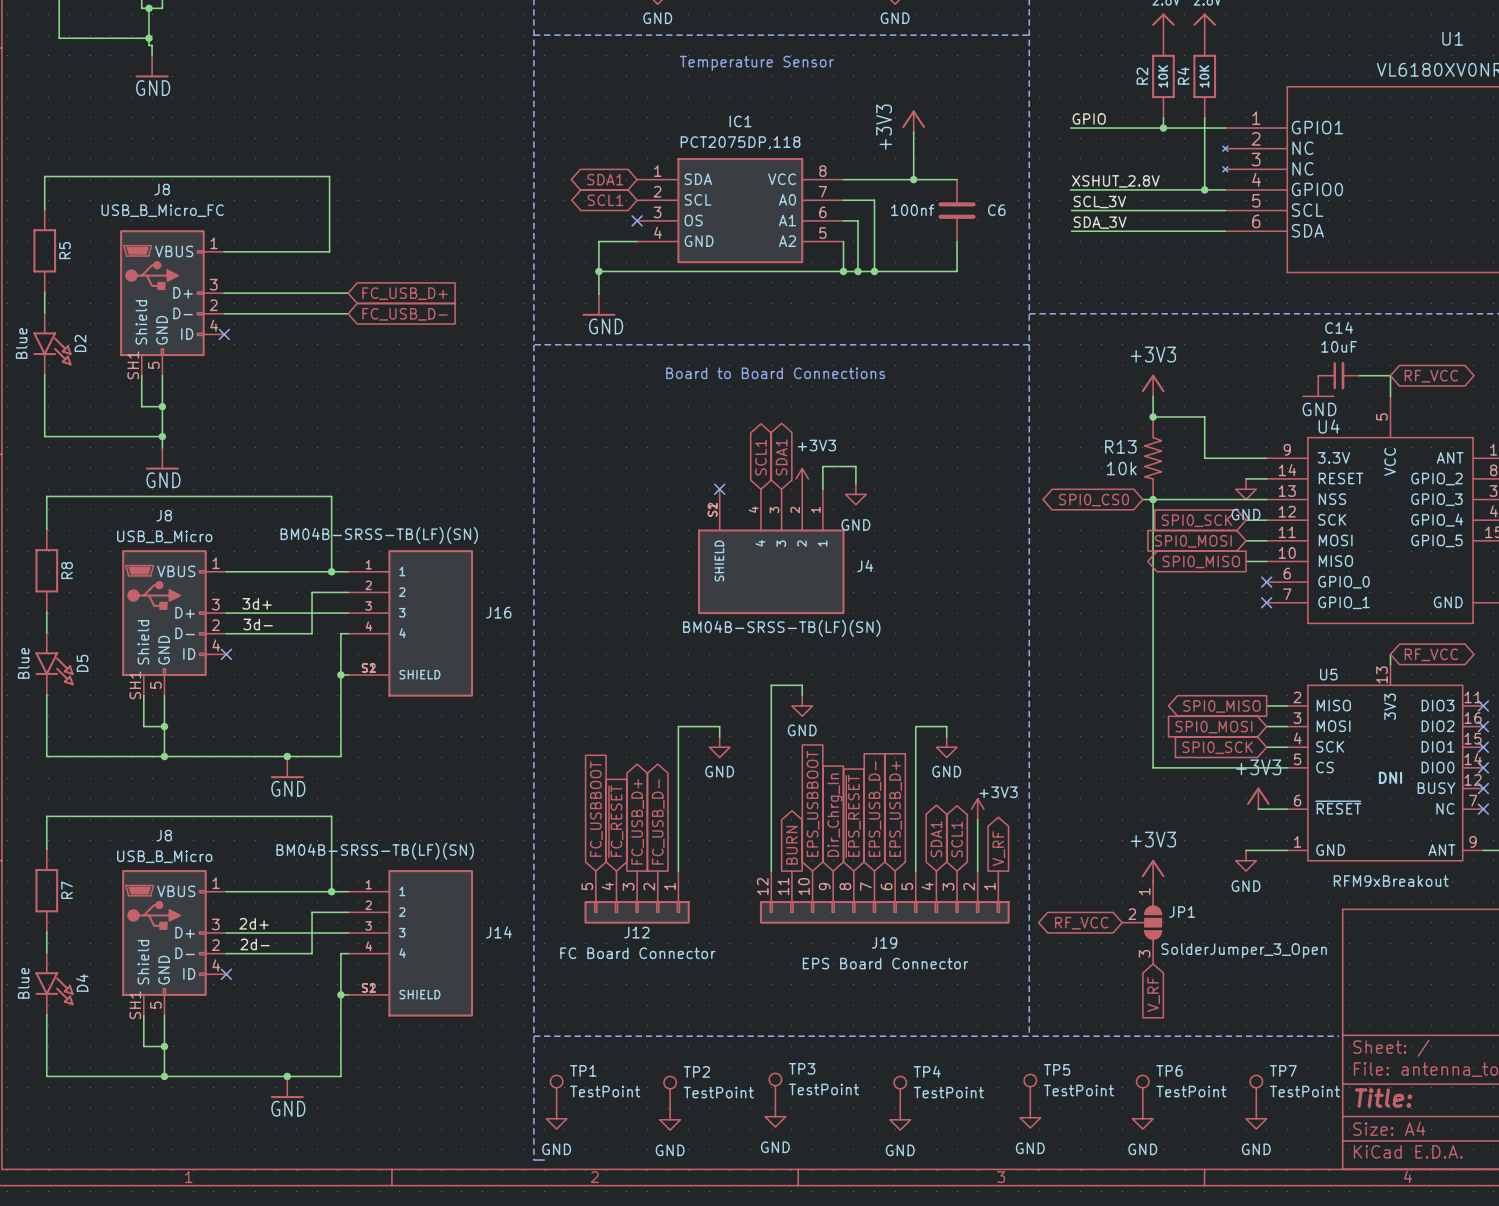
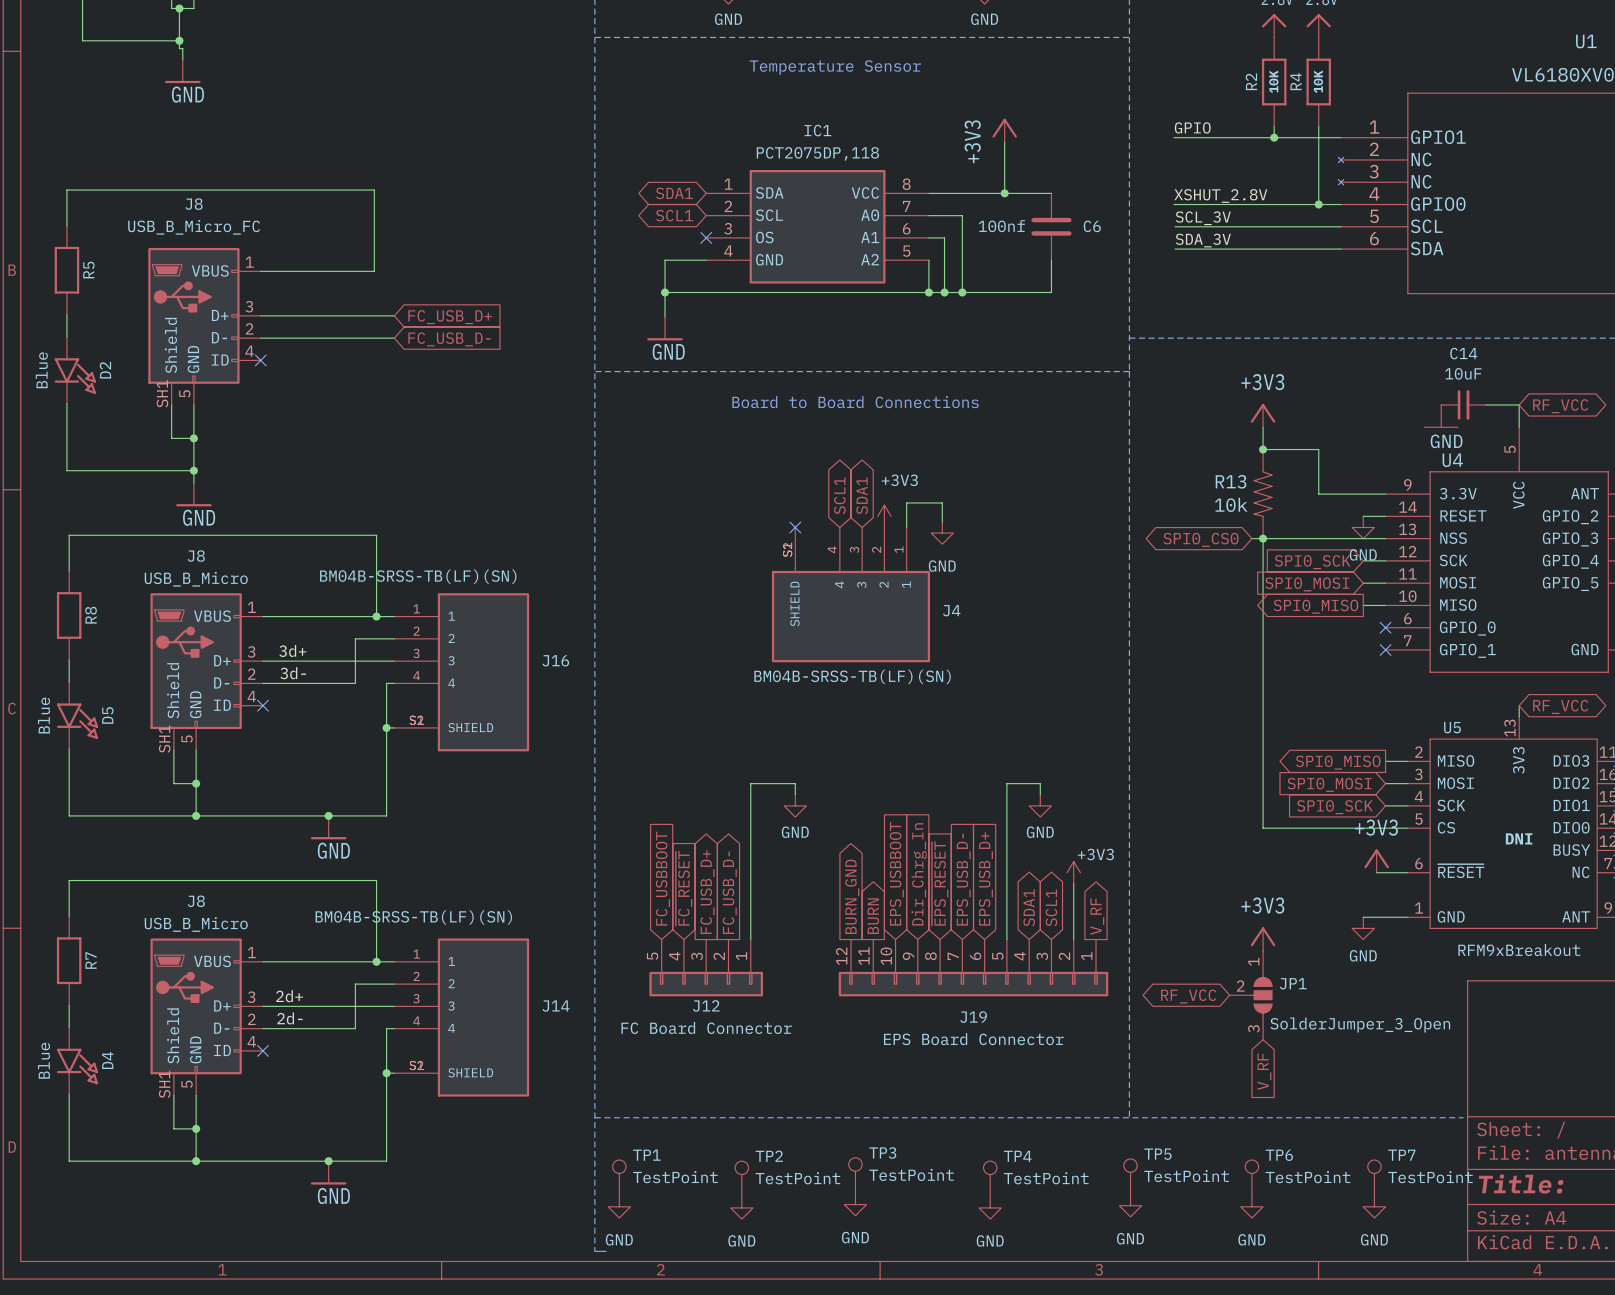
wire: (802, 695) (802, 685) (771, 685) (771, 871) -> none
power symbol: GND (802, 705) -> none
global label: none -> BURN_GND (852, 896)

